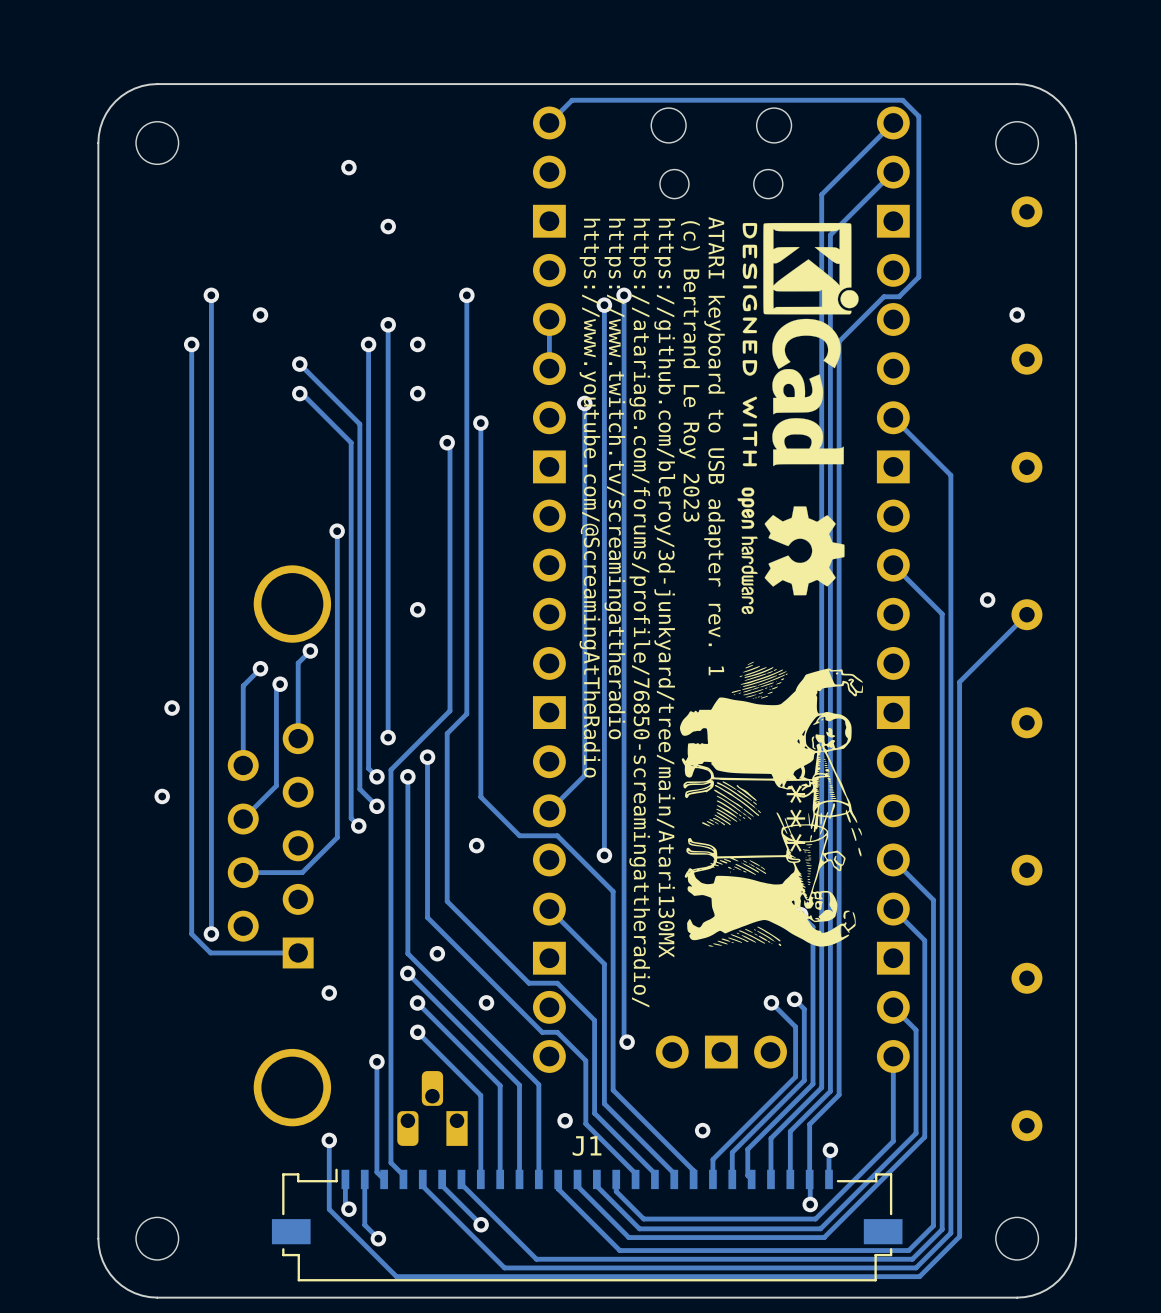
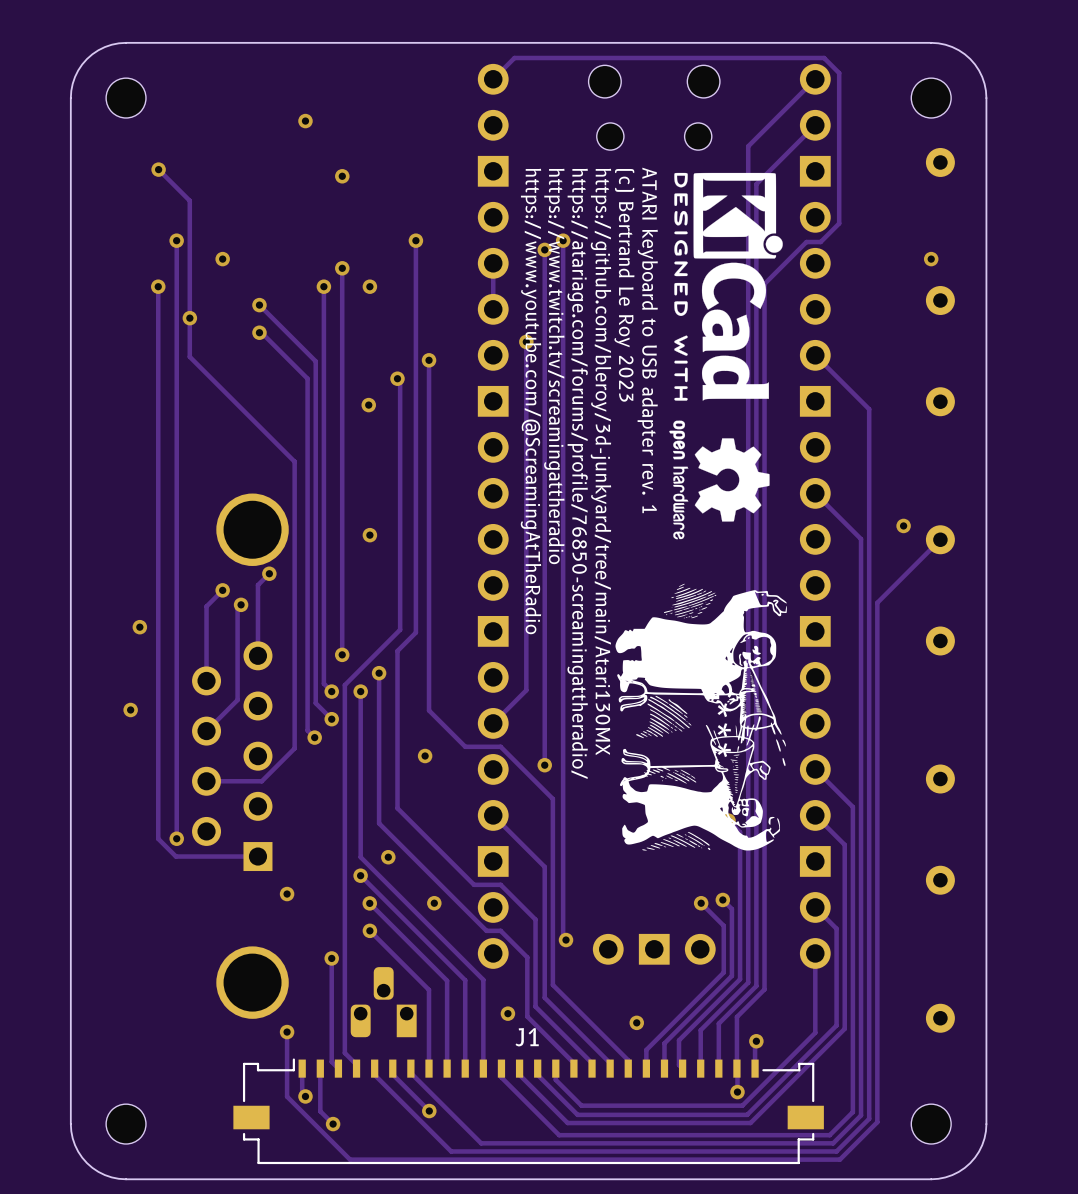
track: none -> (158, 169) (189, 200) (189, 356) (294, 461)
via: none -> (158, 169)
via: none -> (189, 318)
via: (417, 393) -> none
via: none -> (368, 405)
via: (337, 531) -> none

